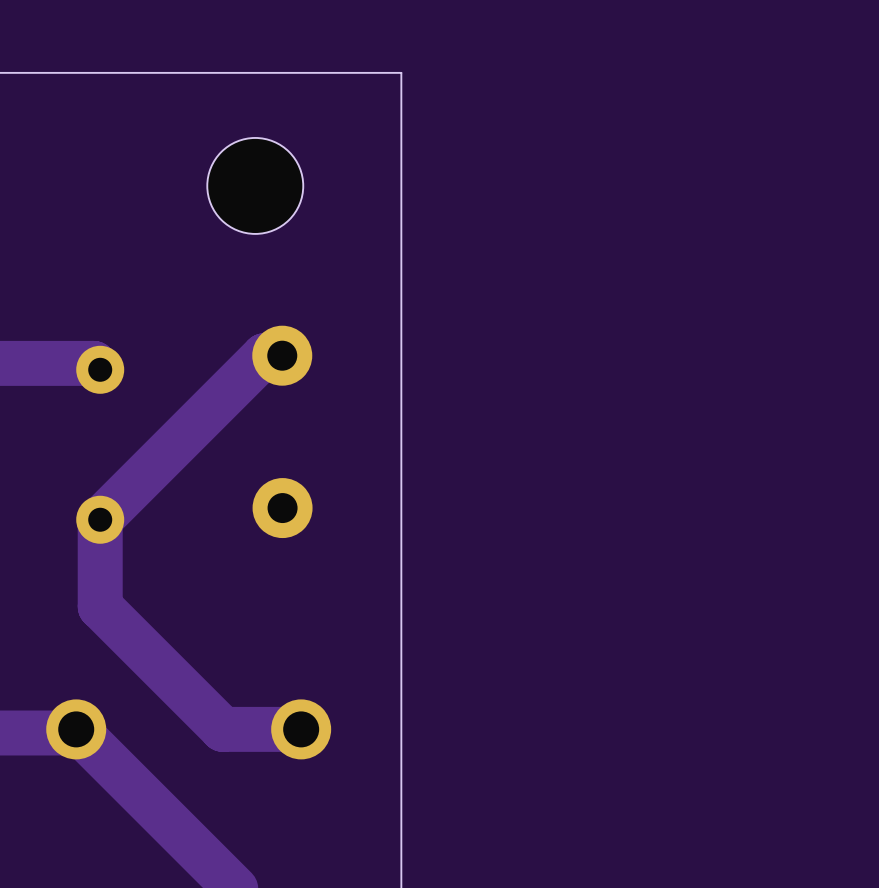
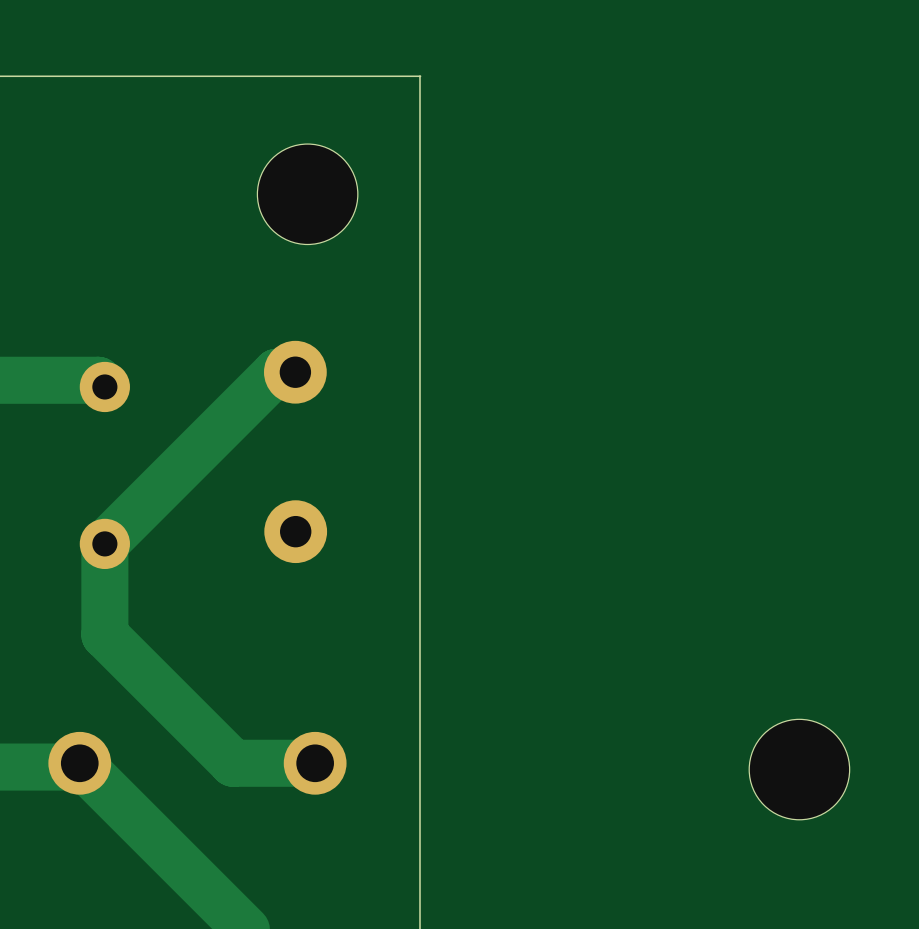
part position: (255, 185) -> (307, 194)
part: none -> (799, 769)

